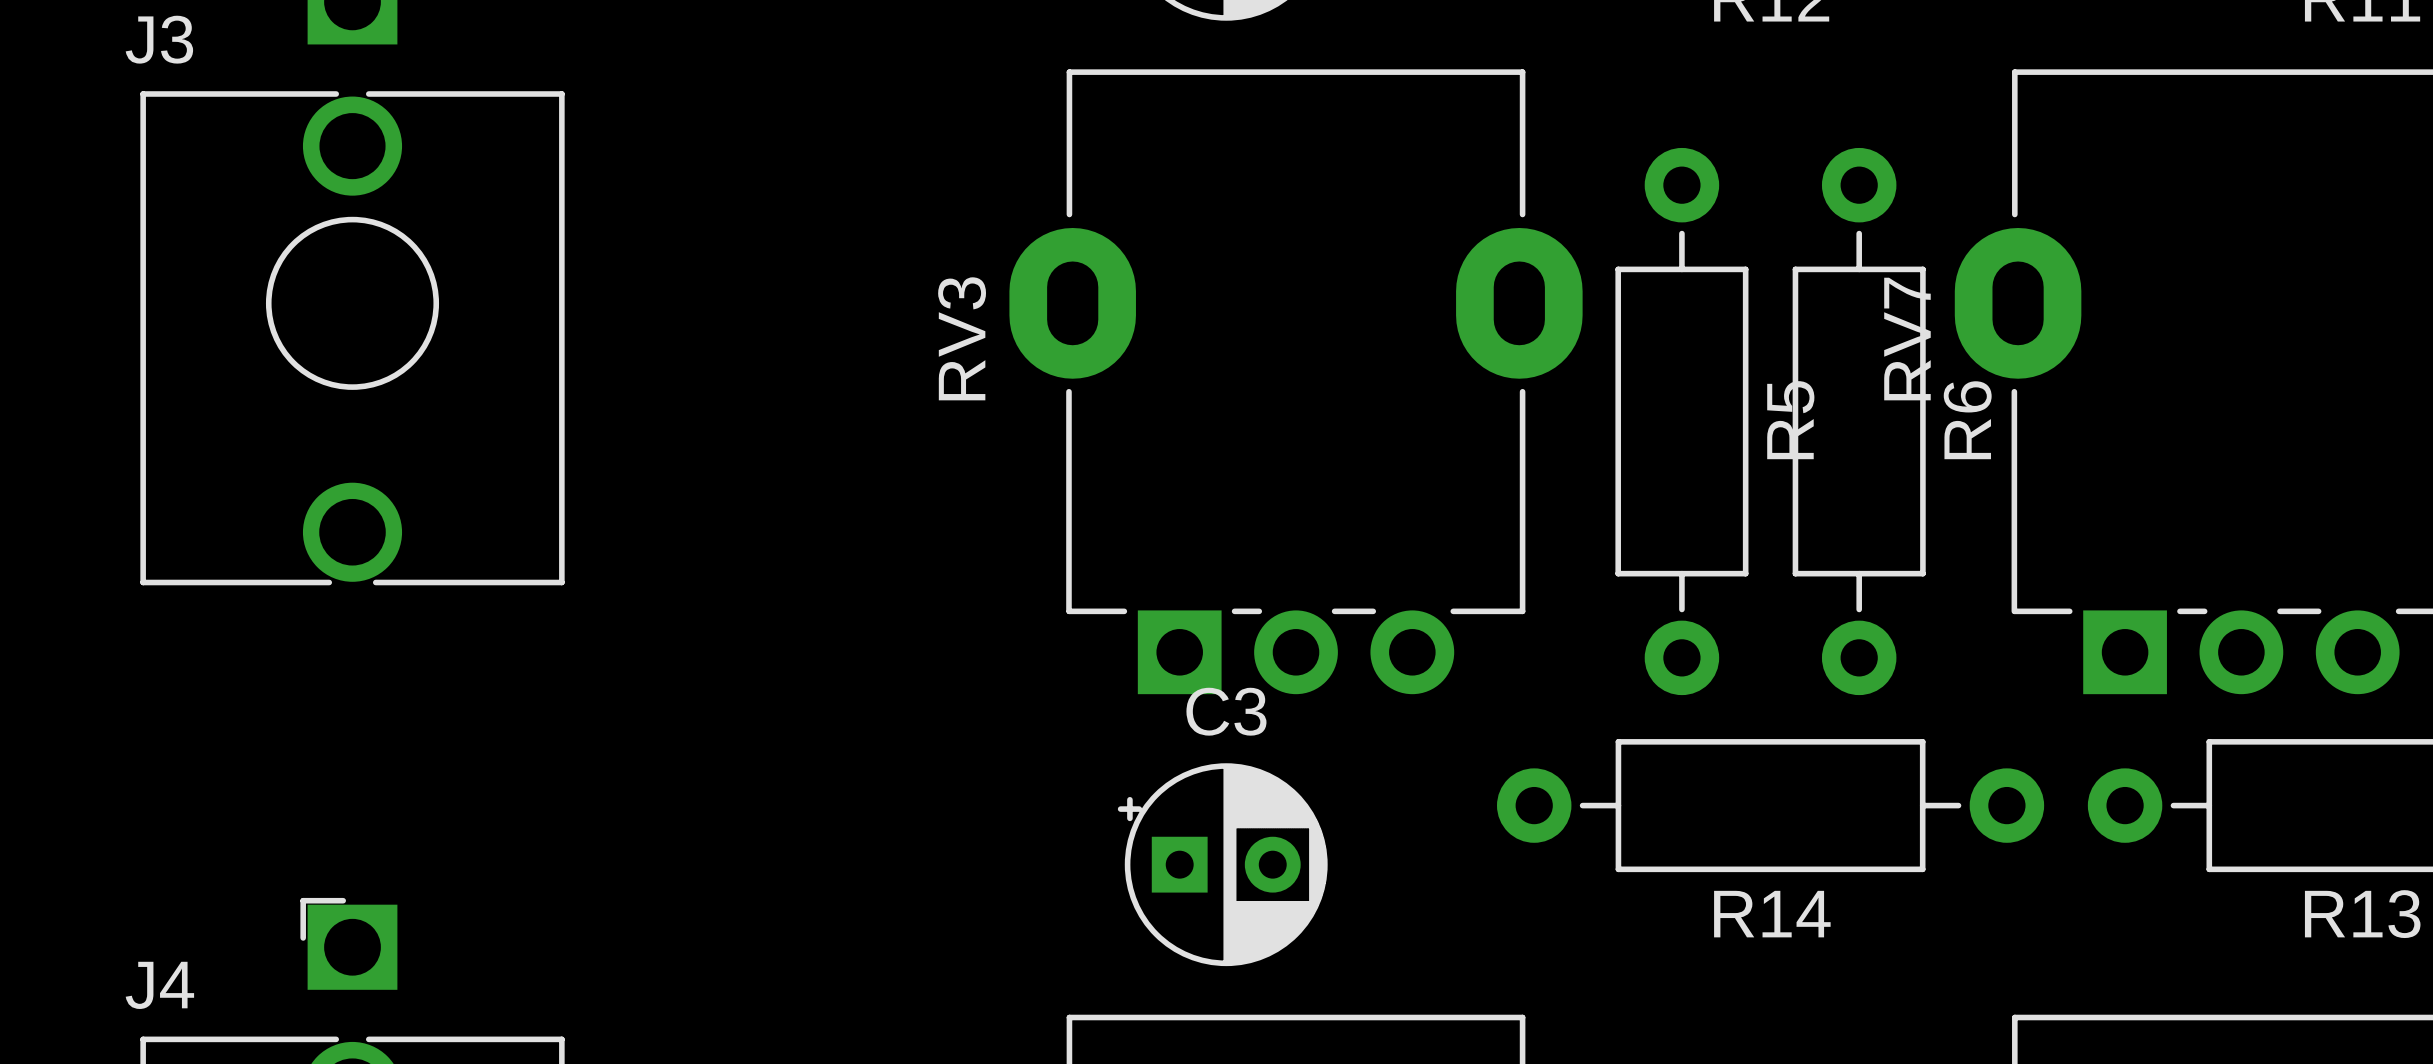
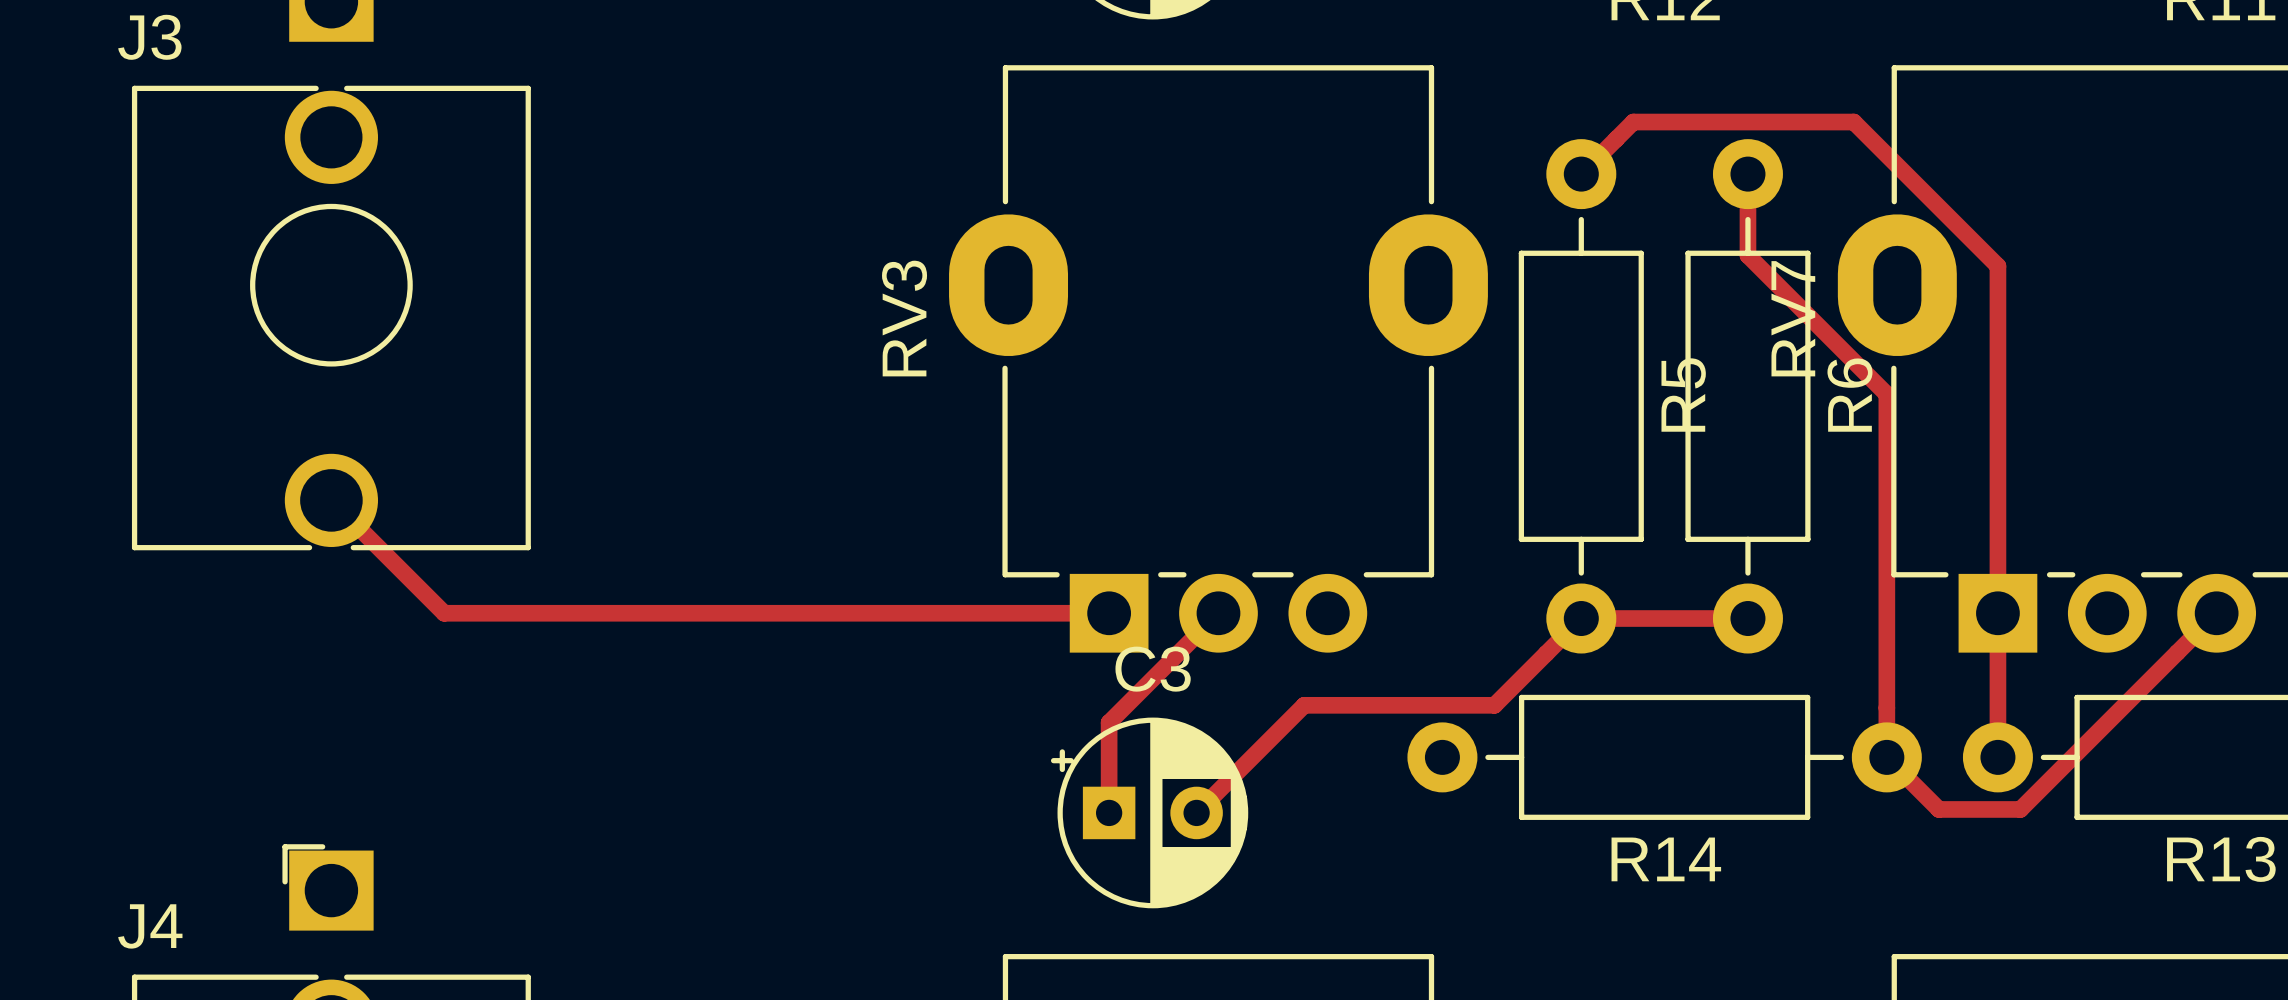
track: none -> (1581, 174) (1633, 122) (1853, 122) (1997, 266) (1997, 757)
track: none -> (1747, 174) (1747, 255) (1886, 394) (1886, 757) (1938, 809) (2020, 809) (2216, 613)
track: none -> (331, 500) (444, 613) (1109, 613)
track: none -> (1218, 613) (1109, 722) (1109, 812)
track: none -> (1747, 618) (1581, 618) (1494, 705) (1304, 705) (1196, 812)

